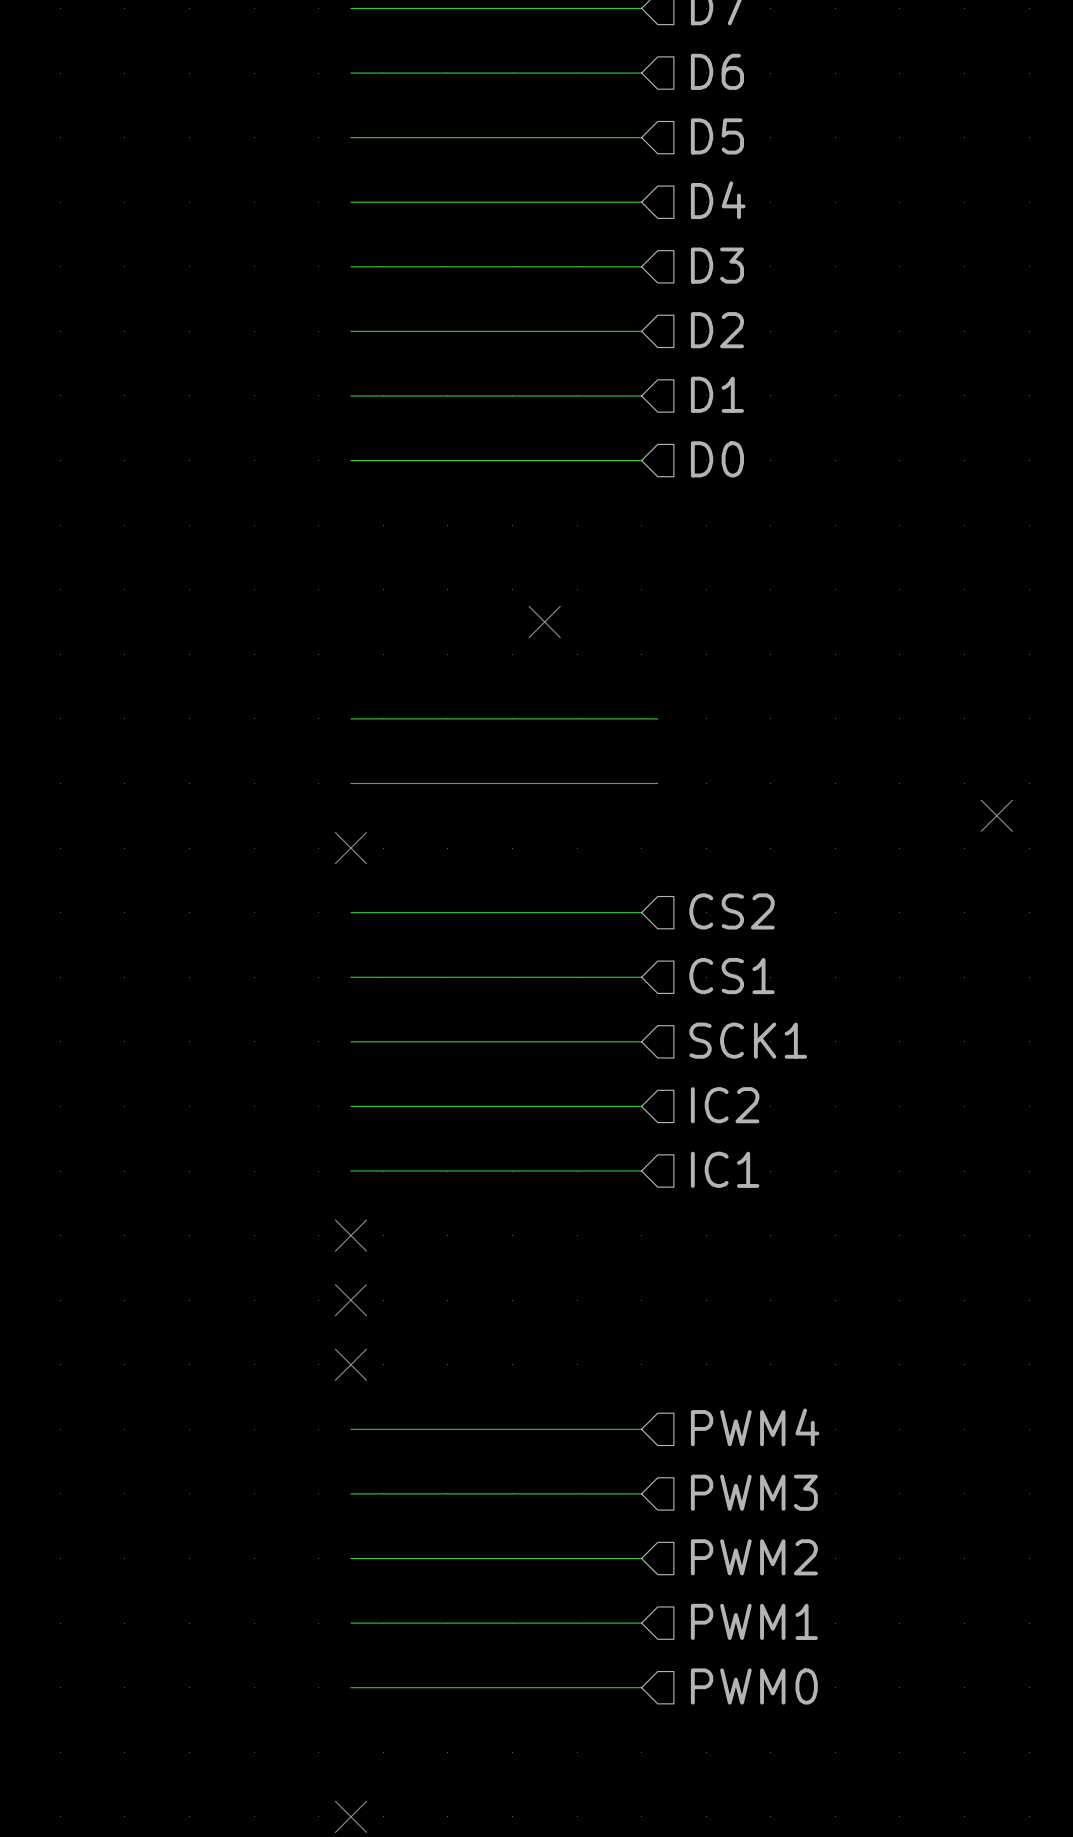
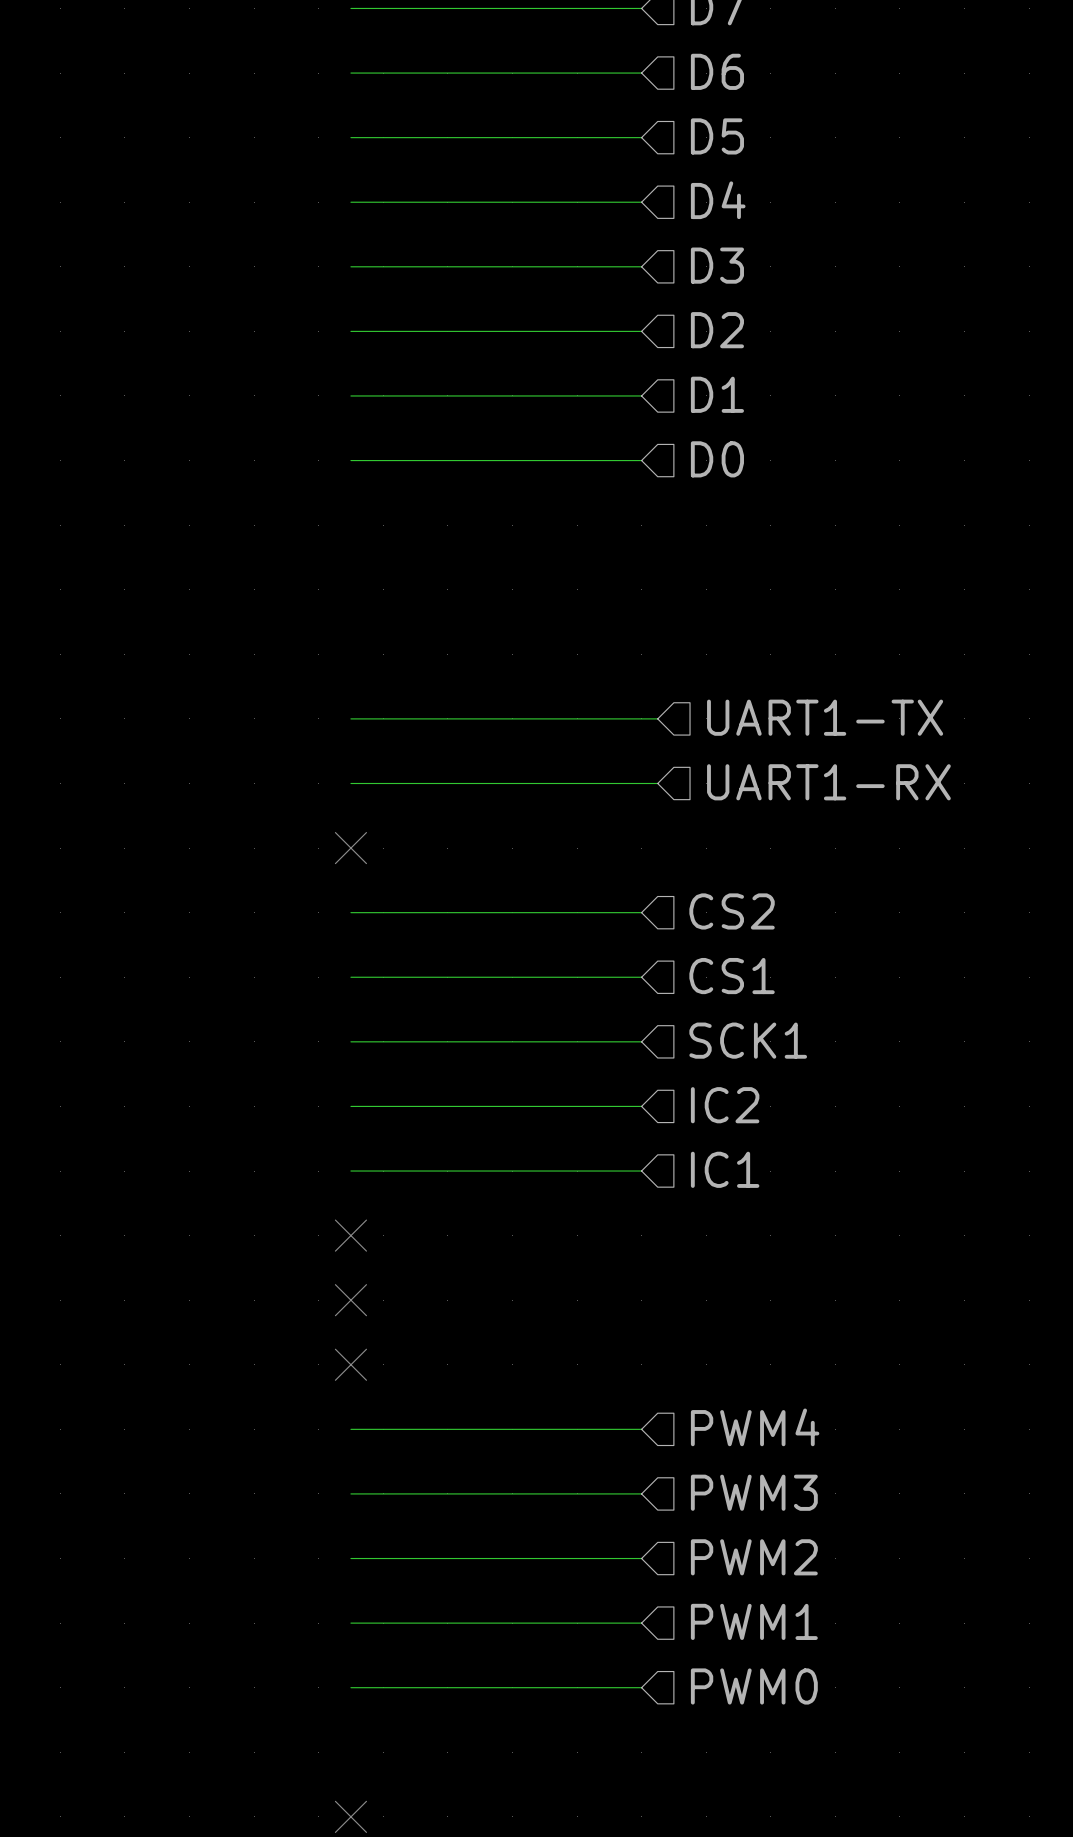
no-connect mark: (544, 622) -> none
hierarchical label: none -> UART1-TX (825, 717)
hierarchical label: none -> UART1-RX (828, 782)
no-connect mark: (996, 815) -> none

